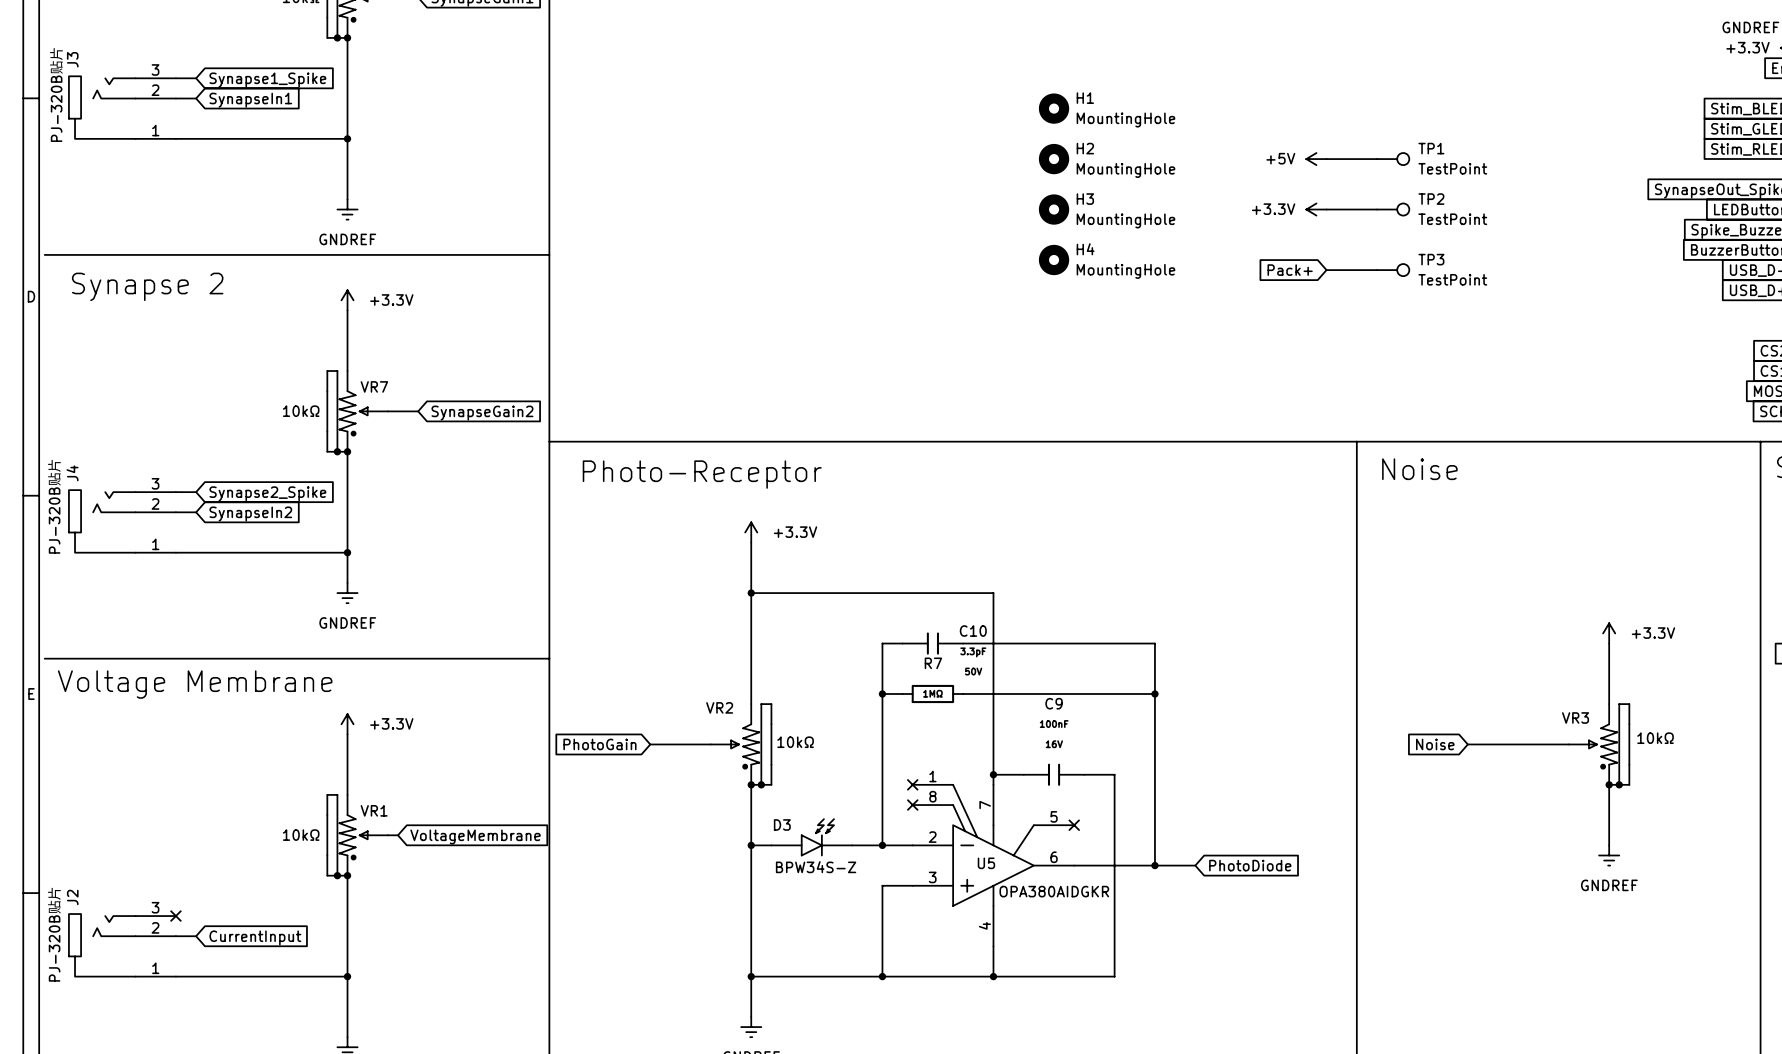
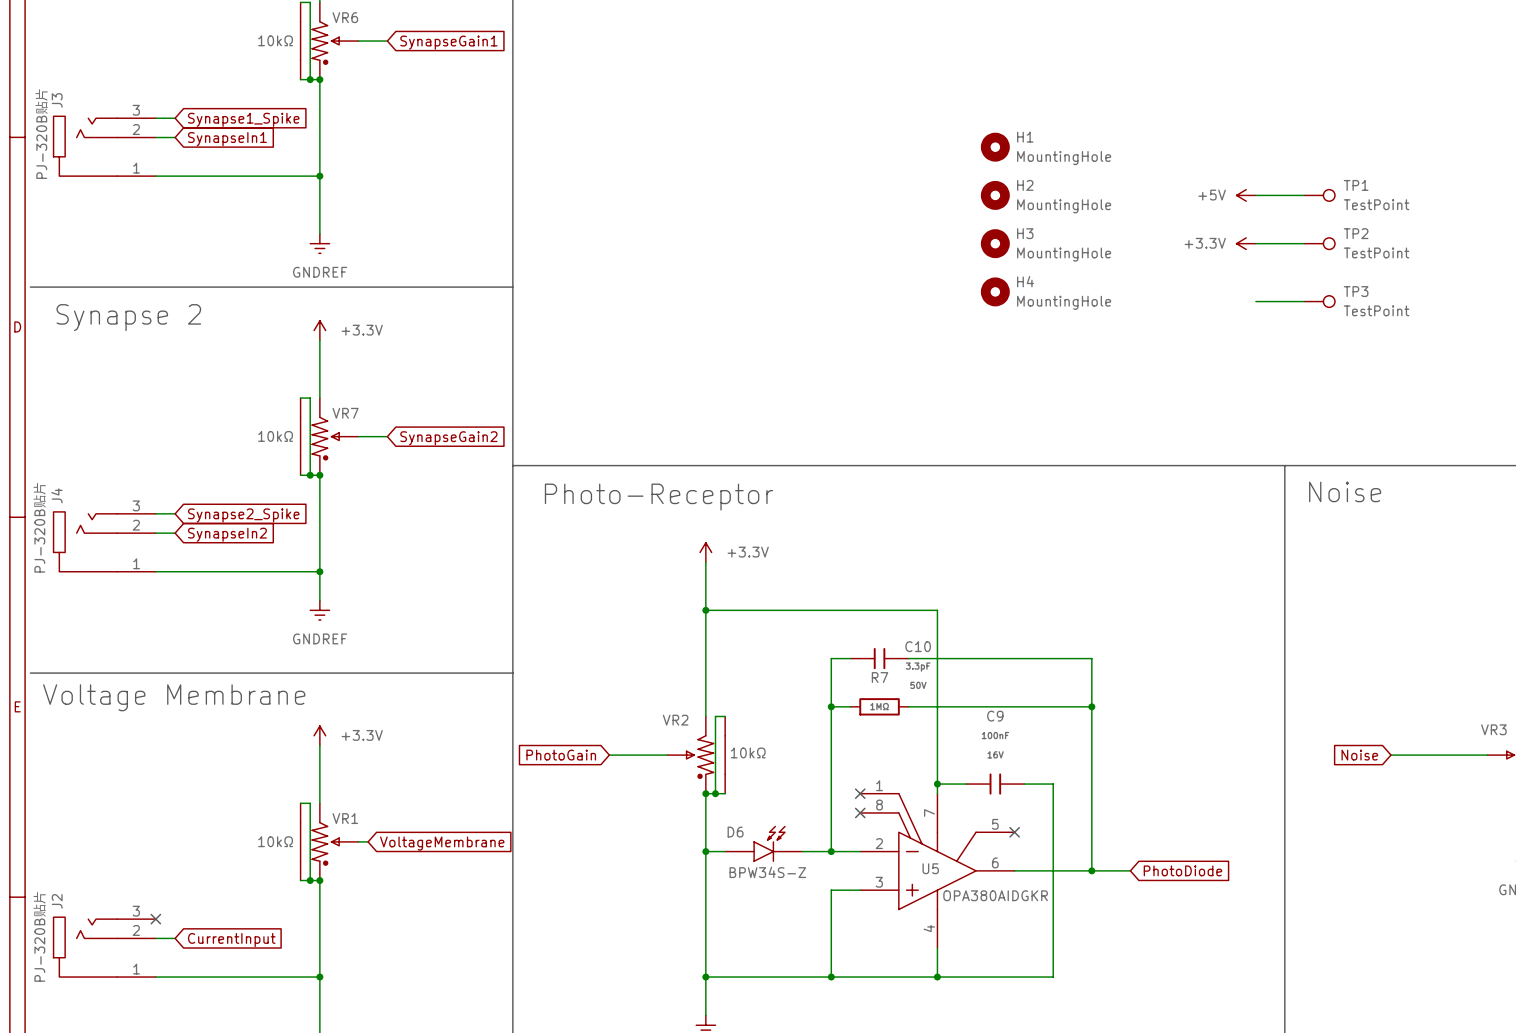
global label: Pack+ (1290, 270) -> none
D3 name: D3 (782, 824) -> D6 (735, 832)

